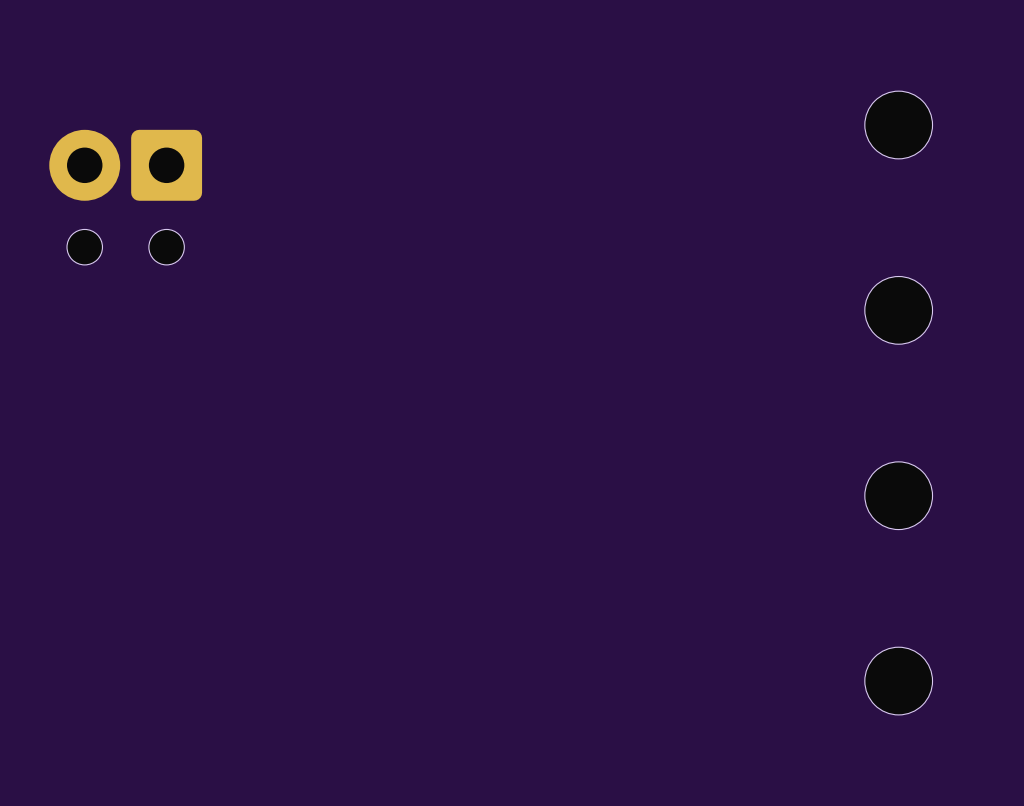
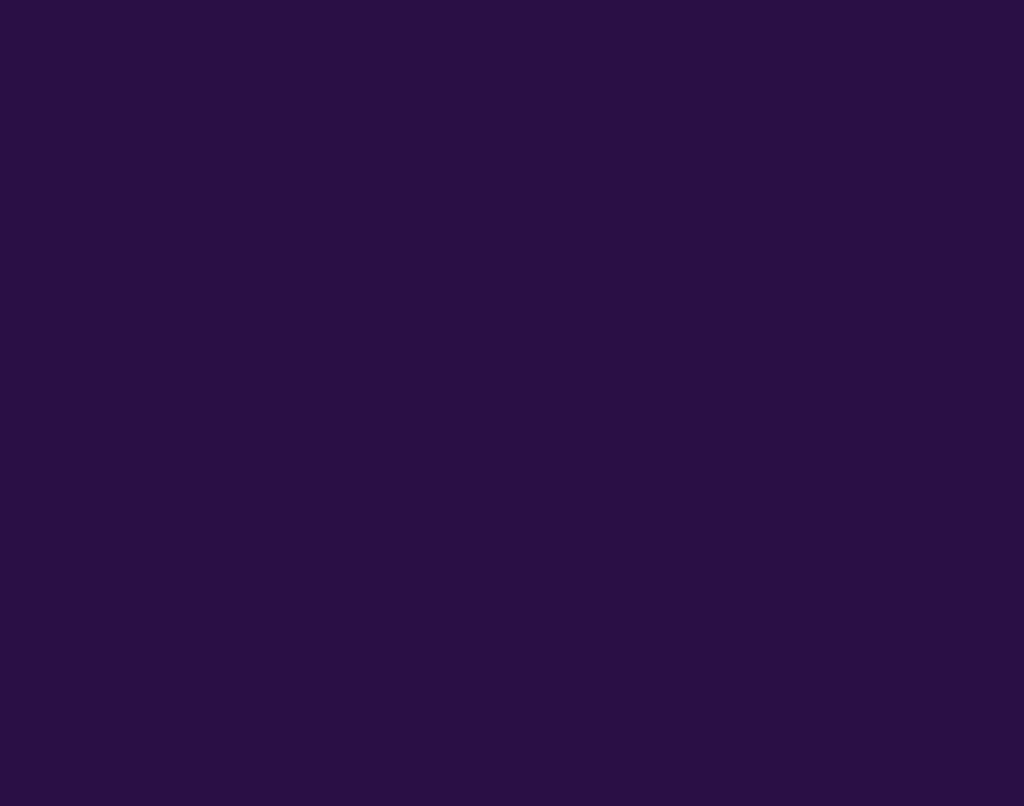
part: (898, 125) -> none
part: (125, 197) -> none
part: (898, 310) -> none
part: (898, 495) -> none
part: (898, 681) -> none

